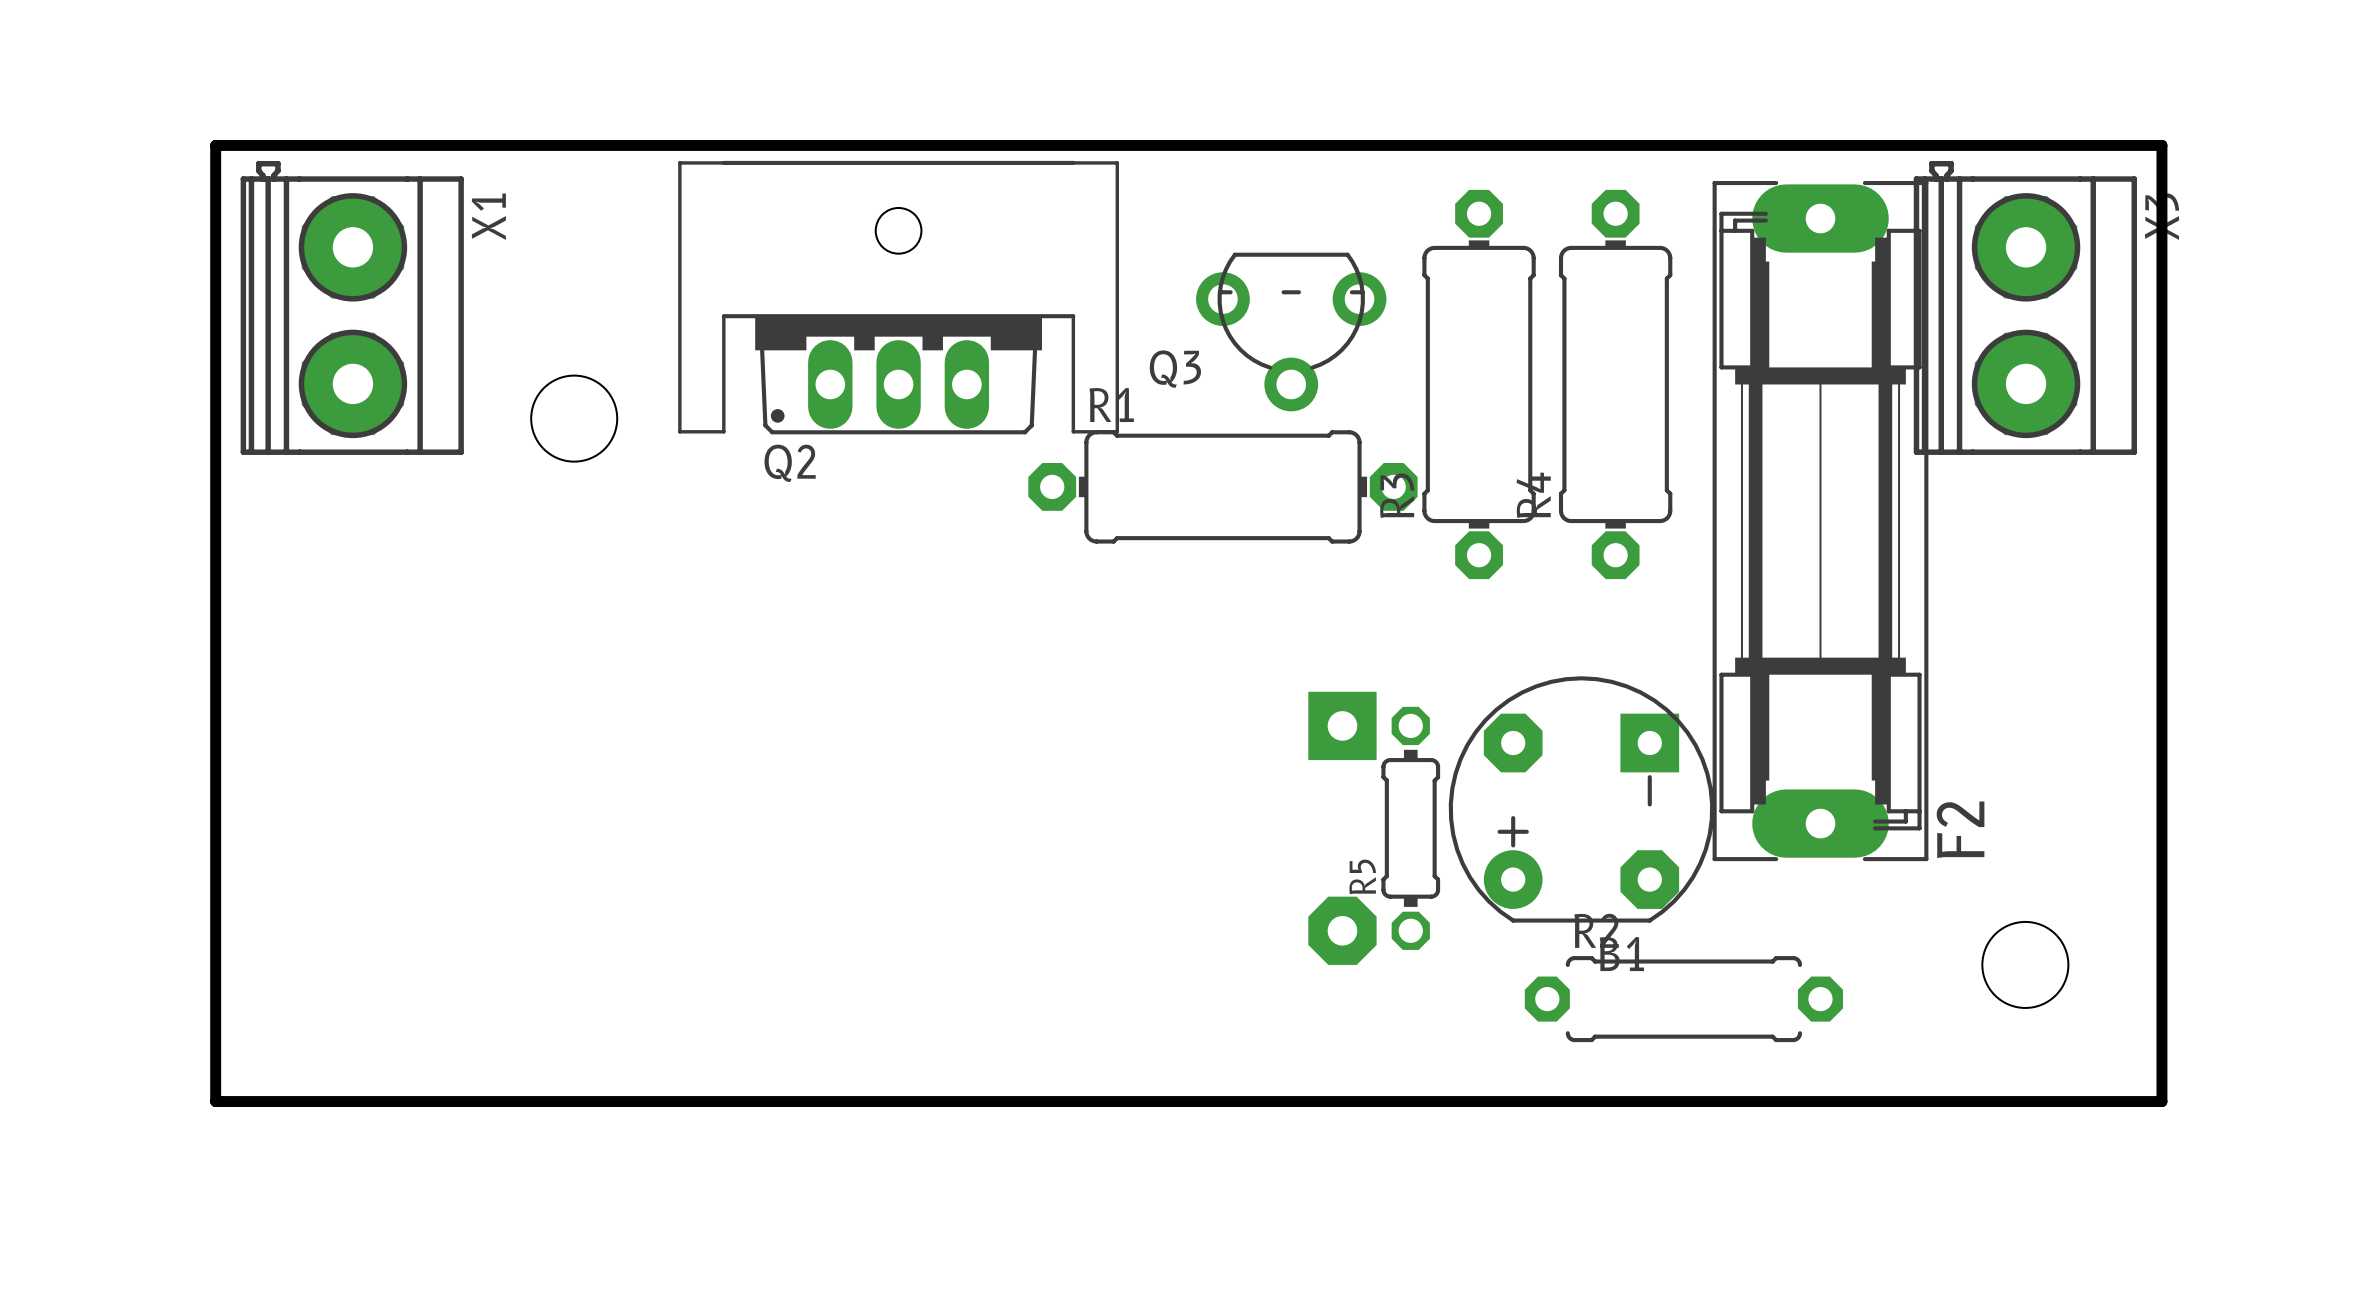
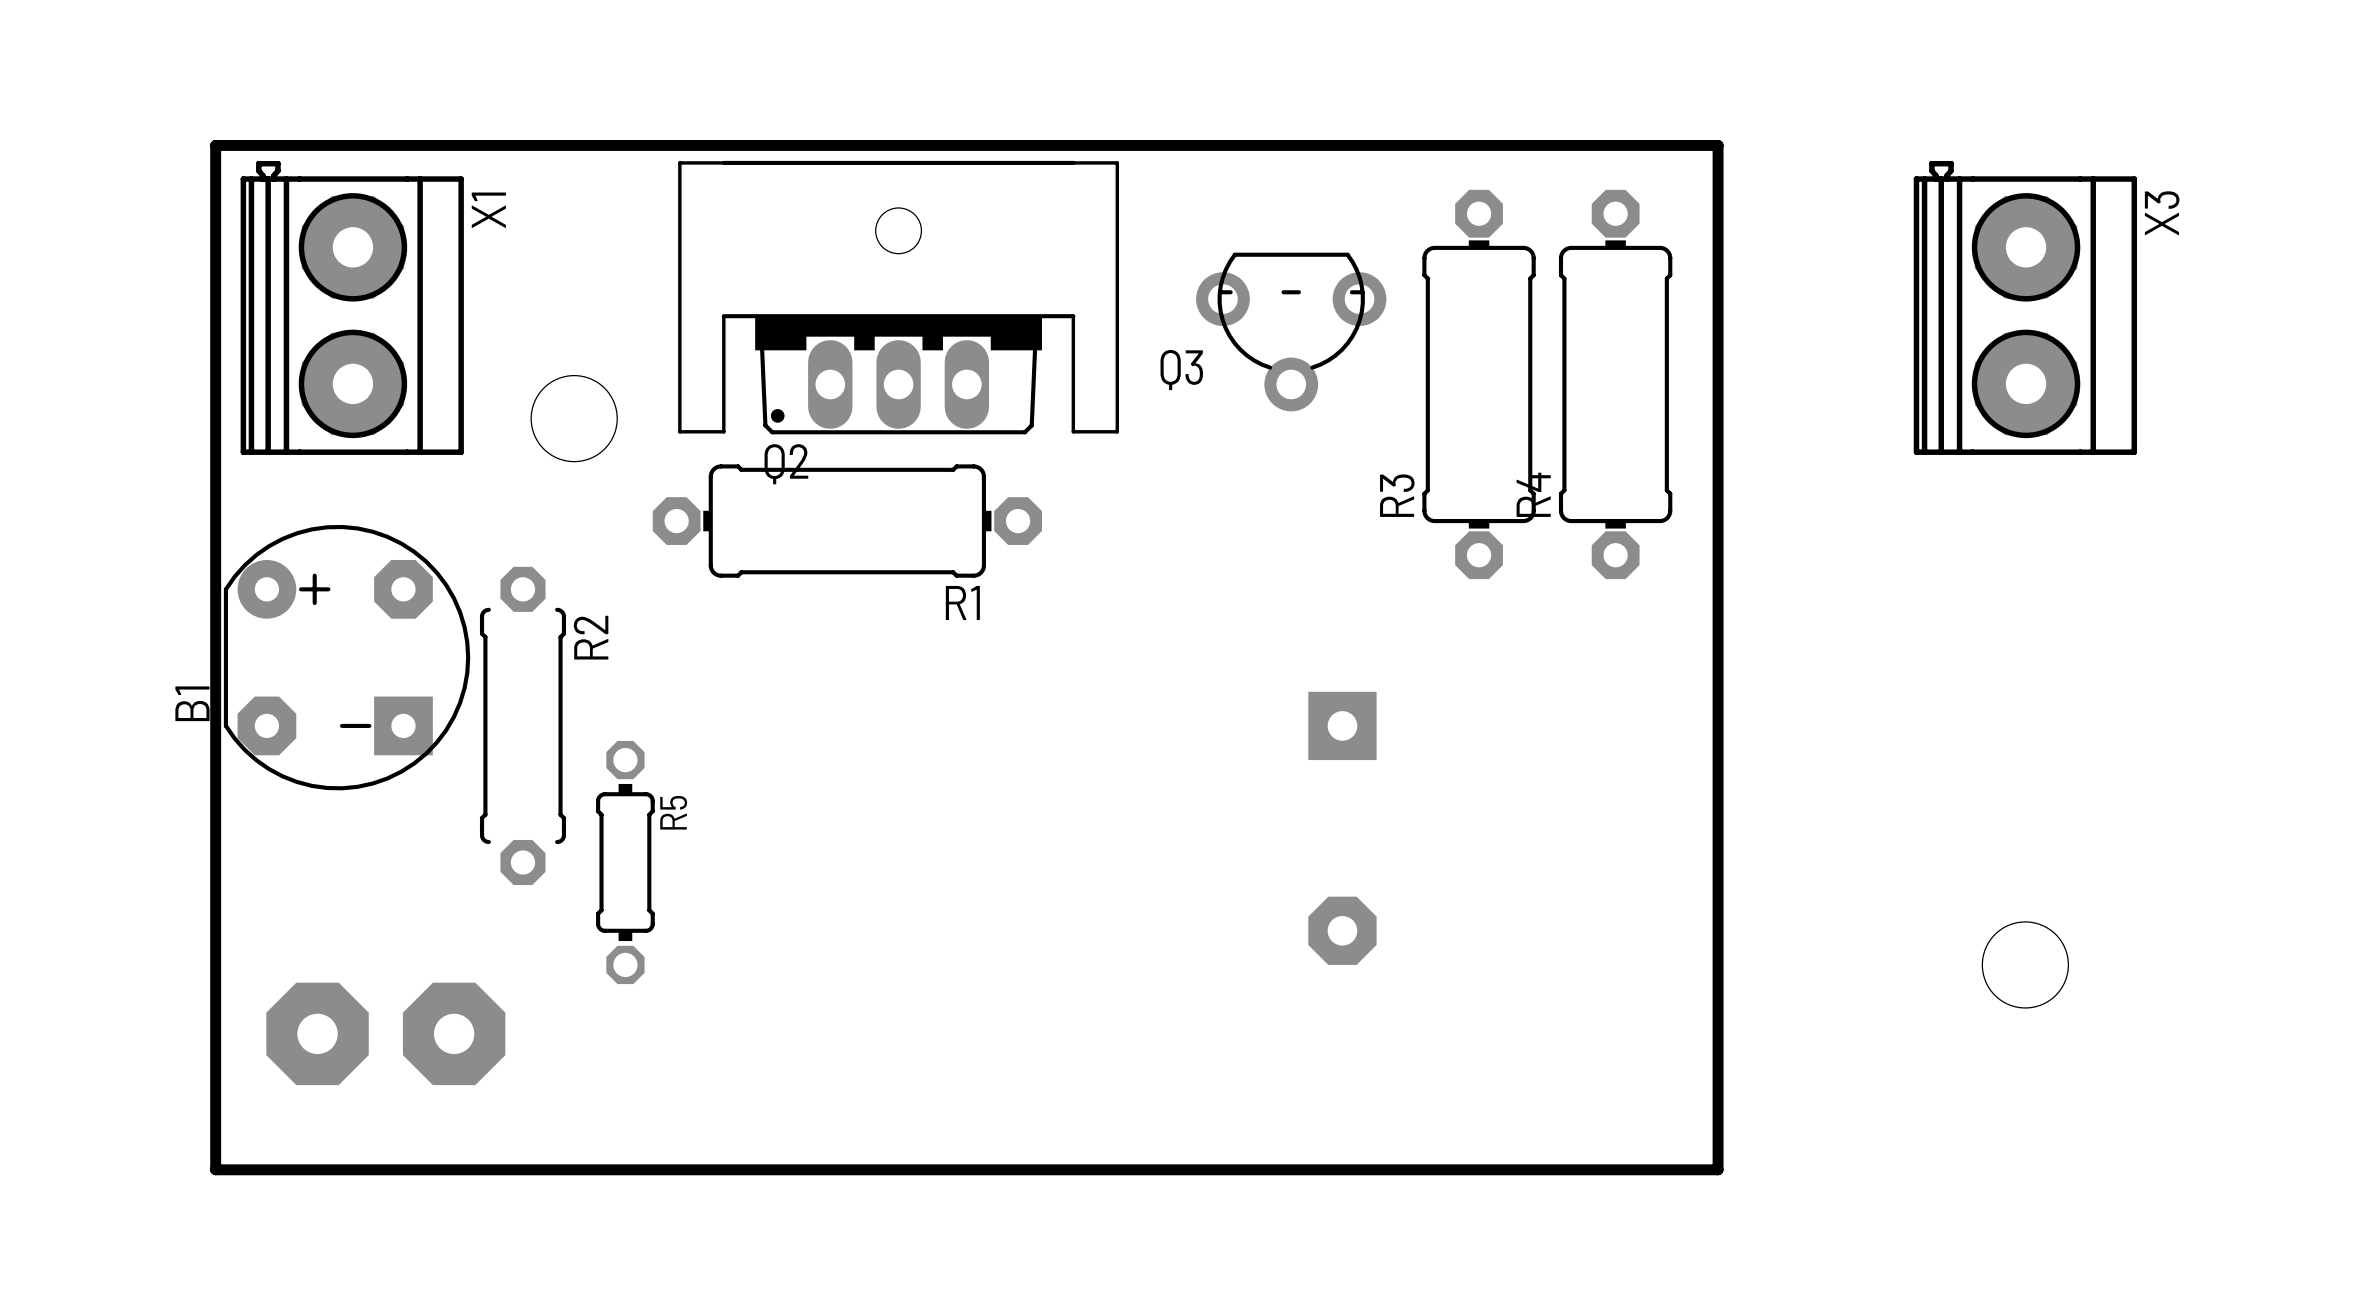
board edge: (1718, 145) (2161, 145) (2161, 1101) (215, 1101) -> (1718, 145) (1718, 1169) (215, 1169) (215, 1101)
R1 name position: R1 (1111, 404) -> R1 (962, 603)
R1 position: (1222, 486) -> (847, 521)
F2: (1820, 521) -> none
B1 rotation: 0° (1581, 799) -> 90° clockwise (347, 657)
B1 position: (1581, 799) -> (347, 657)
R5 position: (1410, 828) -> (625, 862)
R5 name position: R5 (1362, 876) -> R5 (673, 812)
R2 rotation: 0° (1683, 999) -> 90° clockwise (522, 725)
R2 position: (1683, 999) -> (522, 725)
part: none -> (385, 1033)

